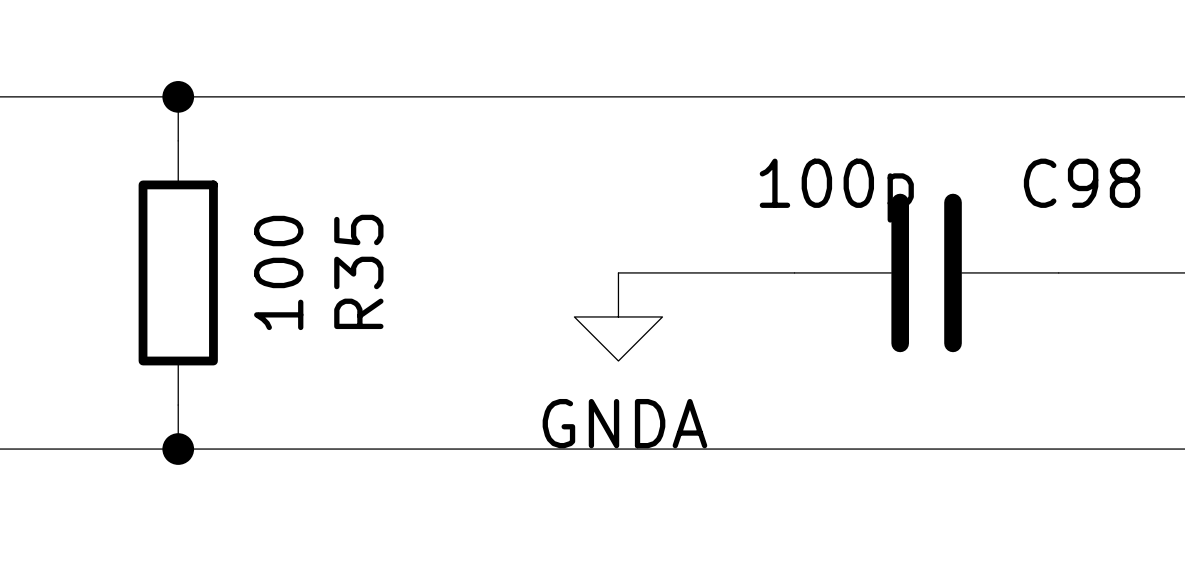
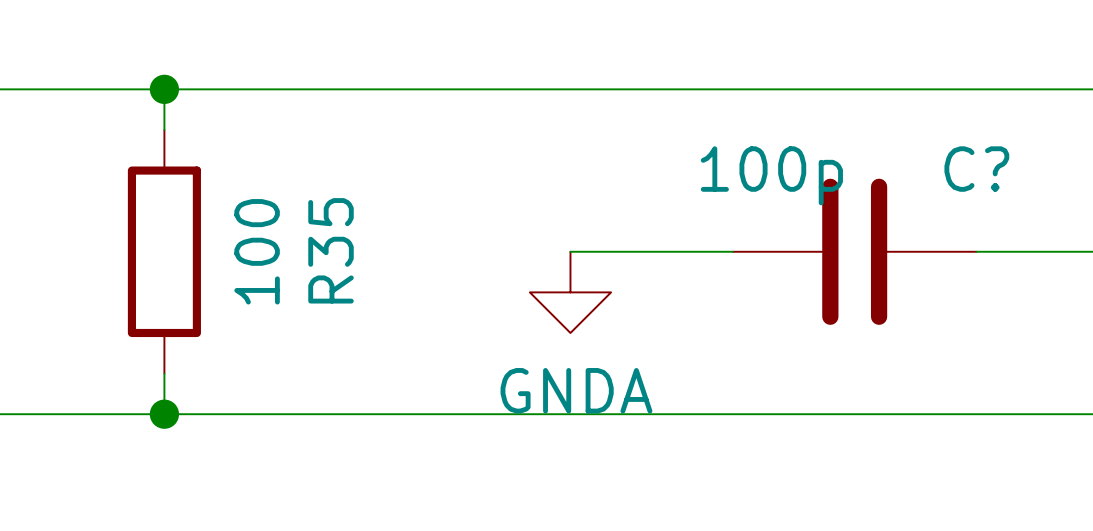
C98 name: C98 (1082, 183) -> C? (976, 169)

